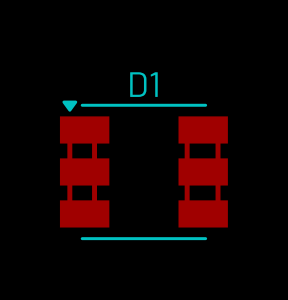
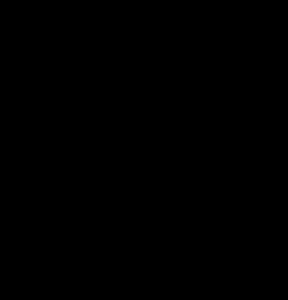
D1: (143, 170) -> none

